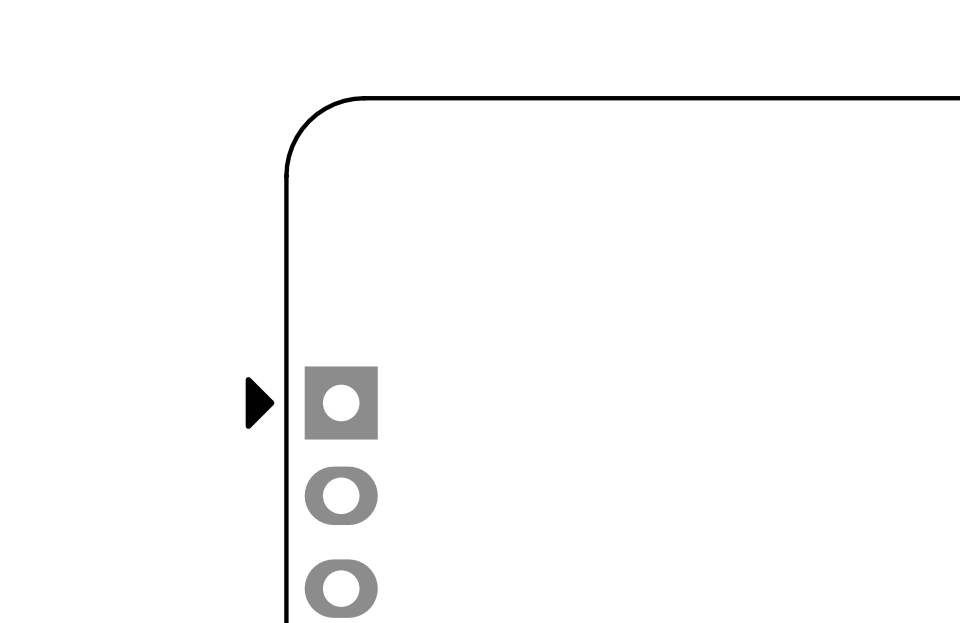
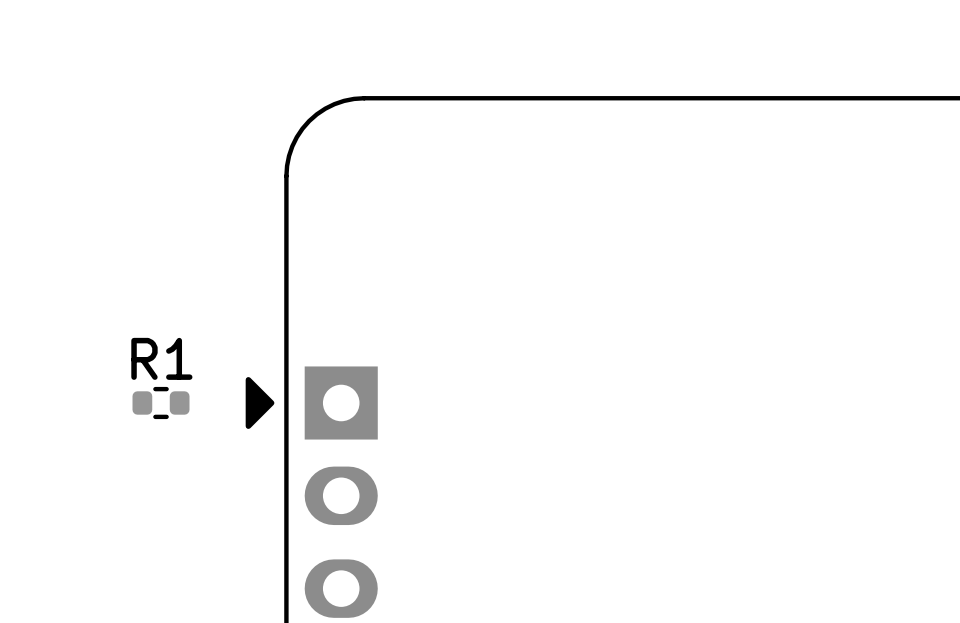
R1: none -> (161, 402)

